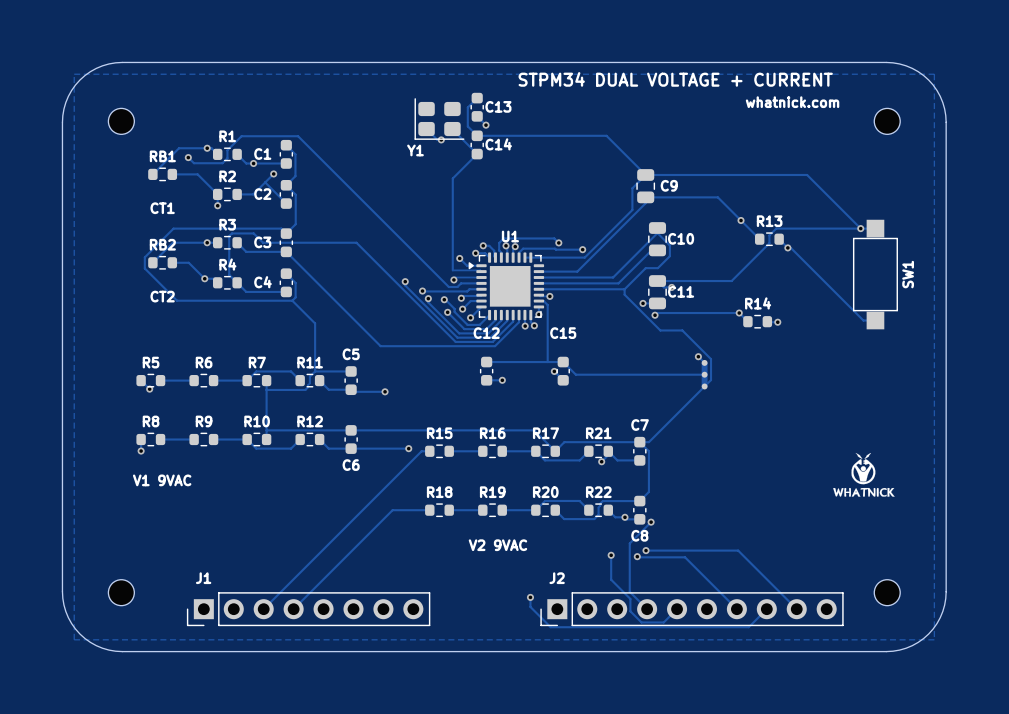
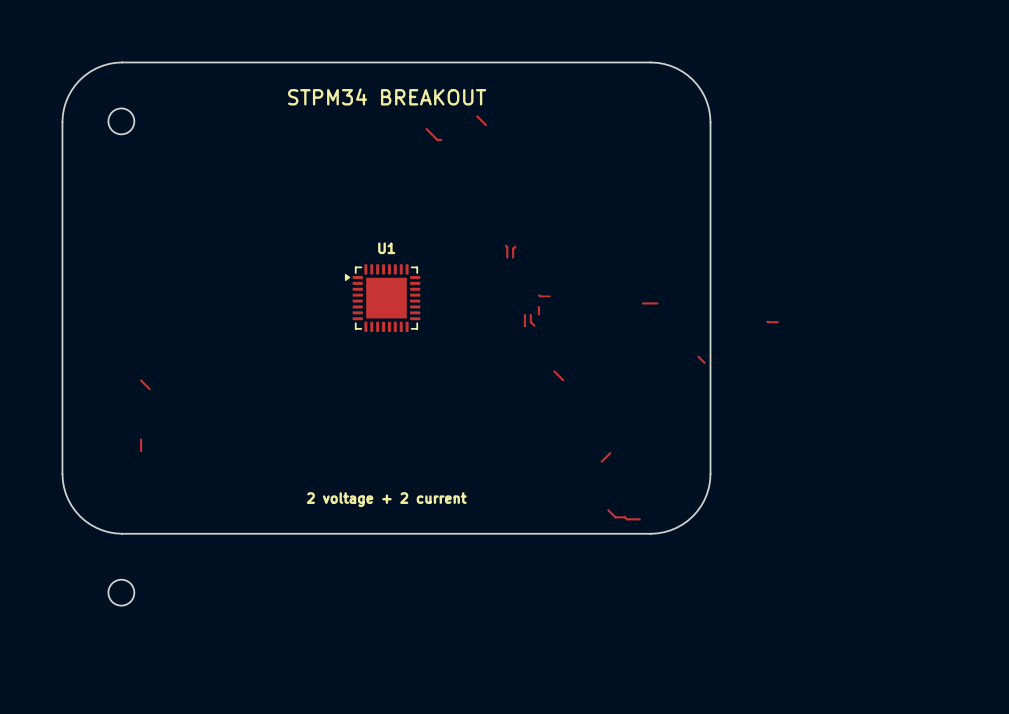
board edge: (650, 62) (893, 62) (906, 65) (918, 71) (933, 85) (940, 96) (944, 109) (946, 122) (946, 591) (942, 611) (936, 623) (928, 634) (918, 642) (906, 648) (886, 651) (109, 650) (96, 645) (79, 634) (71, 623) (63, 605) (62, 473) -> (650, 62) (670, 65) (687, 75) (701, 90) (707, 102) (710, 115) (710, 480) (707, 493) (701, 505) (692, 516) (682, 524) (663, 532) (650, 533) (115, 533) (96, 527) (79, 516) (68, 499) (63, 487) (62, 473)
zone outline: (74, 74) (934, 74) (934, 639) (74, 639) (74, 74) -> none
text: STPM34 DUAL VOLTAGE + CURRENT (675, 79) -> none
text: none -> STPM34 BREAKOUT (387, 96)
track: (477, 98) (467, 107) (467, 126) (477, 135) (606, 135) (645, 174) -> none
text: whatnick.com (792, 102) -> none
C13: (477, 107) -> none
Y1: (439, 119) -> none
part: (887, 121) -> none
via: (486, 125) -> none
track: (452, 129) (477, 154) (452, 178) (452, 270) (481, 271) -> none
via: (441, 139) -> none
C14: (477, 144) -> none
track: (286, 145) (295, 154) (295, 176) (286, 185) (295, 194) (295, 224) (286, 233) (281, 228) (173, 228) (144, 257) (144, 268) (177, 300) (292, 300) -> none
via: (207, 148) -> none
track: (217, 154) (211, 148) (179, 148) (152, 174) -> none
R1: (227, 154) -> none
track: (237, 154) (246, 163) (286, 163) -> none
C1: (286, 154) -> none
track: (188, 157) (193, 163) (222, 163) (227, 158) (227, 150) (241, 136) (298, 136) (448, 287) (457, 287) (461, 283) (481, 283) -> none
via: (188, 157) -> none
via: (253, 163) -> none
track: (273, 173) (253, 194) (237, 194) -> none
via: (273, 173) -> none
RB1: (162, 174) -> none
track: (172, 174) (197, 174) (217, 194) (217, 205) -> none
track: (645, 174) (632, 188) (632, 209) (584, 257) (524, 257) -> none
track: (645, 174) (807, 174) (860, 228) -> none
track: (265, 182) (286, 203) -> none
C9: (645, 186) -> none
R2: (227, 194) -> none
C2: (286, 194) -> none
via: (217, 205) -> none
text: CT1 (162, 208) -> none
via: (741, 220) -> none
via: (860, 228) -> none
track: (875, 228) (776, 228) (769, 235) (769, 243) (731, 281) (657, 281) (663, 287) (671, 287) -> none
track: (657, 233) (613, 277) (538, 277) -> none
track: (657, 233) (669, 245) (669, 256) (657, 268) (645, 268) (624, 289) -> none
C10: (657, 239) -> none
track: (759, 239) (717, 197) (645, 197) (645, 203) (577, 271) (538, 271) -> none
R13: (769, 239) -> none
track: (779, 239) (787, 247) (790, 247) (863, 320) (875, 320) -> none
via: (207, 242) -> none
track: (217, 242) (172, 242) (152, 262) -> none
R3: (227, 242) -> none
track: (237, 242) (246, 251) (286, 251) (380, 346) (495, 346) (519, 322) (519, 315) -> none
C3: (286, 242) -> none
track: (558, 242) (554, 238) (503, 238) (499, 242) (501, 257) -> none
via: (558, 242) -> none
track: (483, 245) (489, 245) (494, 250) (495, 257) -> none
via: (483, 245) -> none
via: (506, 245) -> none
via: (515, 246) -> none
via: (787, 247) -> none
track: (582, 249) (523, 248) (519, 252) (519, 257) -> none
via: (582, 249) -> none
track: (657, 250) (651, 250) (618, 283) (538, 283) -> none
track: (475, 253) (485, 253) (489, 257) -> none
via: (475, 253) -> none
track: (459, 258) (466, 265) (481, 265) -> none
via: (459, 258) -> none
RB2: (162, 262) -> none
track: (172, 262) (188, 262) (204, 278) (213, 278) (217, 282) -> none
track: (286, 273) (295, 282) (295, 297) (292, 300) -> none
SW1: (875, 274) -> none
track: (481, 277) (455, 277) (453, 279) -> none
via: (204, 278) -> none
via: (453, 279) -> none
track: (405, 281) (405, 285) (457, 337) (490, 337) (507, 320) (507, 315) -> none
via: (405, 281) -> none
R4: (227, 282) -> none
C4: (286, 282) -> none
U1 position: (506, 286) -> (382, 298)
via: (671, 287) -> none
track: (481, 289) (469, 289) (467, 291) (422, 291) -> none
track: (538, 289) (624, 289) -> none
track: (624, 289) (624, 294) (660, 330) (682, 330) (711, 359) (711, 380) (648, 442) (564, 442) (555, 451) (534, 430) (266, 430) -> none
track: (286, 291) (246, 291) (229, 274) (229, 236) (231, 233) (253, 233) (263, 242) (356, 242) (455, 341) (492, 341) (513, 321) (513, 315) -> none
via: (422, 291) -> none
C11: (657, 292) -> none
track: (481, 295) (463, 295) (461, 298) -> none
text: CT2 (162, 296) -> none
via: (549, 296) -> none
track: (428, 298) (428, 302) (459, 333) (488, 333) (501, 320) (501, 315) -> none
via: (428, 298) -> none
via: (461, 298) -> none
track: (444, 299) (467, 324) (479, 324) (489, 315) -> none
via: (444, 299) -> none
track: (292, 300) (315, 323) (315, 371) -> none
track: (481, 301) (470, 301) (462, 309) -> none
track: (538, 301) (543, 301) (547, 305) (547, 362) -> none
via: (643, 303) -> none
track: (481, 306) (470, 317) -> none
via: (462, 309) -> none
track: (447, 312) (464, 329) (486, 329) (495, 320) (495, 315) -> none
via: (447, 312) -> none
via: (739, 313) -> none
via: (538, 314) -> none
track: (655, 315) (657, 313) (739, 313) (747, 321) -> none
via: (655, 315) -> none
via: (470, 317) -> none
R14: (757, 321) -> none
via: (777, 322) -> none
via: (534, 325) -> none
via: (525, 326) -> none
via: (698, 356) -> none
track: (486, 362) (563, 362) (575, 374) (704, 374) -> none
track: (315, 371) (351, 371) -> none
track: (315, 371) (309, 376) (309, 383) (305, 389) (266, 389) -> none
C12: (486, 371) -> none
via: (554, 371) -> none
C15: (563, 371) -> none
part: (704, 374) -> none
R5: (150, 380) -> none
track: (160, 380) (194, 380) -> none
R6: (203, 380) -> none
track: (213, 380) (247, 380) (256, 371) (291, 371) (300, 380) -> none
R7: (256, 380) -> none
track: (266, 380) (266, 439) -> none
R11: (309, 380) -> none
track: (319, 380) (328, 389) (385, 391) -> none
C5: (351, 380) -> none
track: (486, 380) (502, 380) -> none
via: (502, 380) -> none
via: (149, 389) -> none
via: (385, 391) -> none
R8: (150, 439) -> none
track: (160, 439) (194, 439) -> none
R9: (203, 439) -> none
track: (213, 439) (247, 439) (256, 448) (291, 448) (300, 439) -> none
R10: (256, 439) -> none
R12: (309, 439) -> none
track: (319, 439) (328, 448) (408, 448) -> none
C6: (351, 439) -> none
track: (639, 442) (648, 451) (648, 491) (639, 501) (602, 501) (598, 507) (598, 514) (594, 519) (564, 519) (555, 510) -> none
via: (408, 448) -> none
via: (141, 451) -> none
track: (429, 451) (421, 451) (263, 609) -> none
R15: (439, 451) -> none
track: (449, 451) (482, 451) -> none
R16: (492, 451) -> none
track: (502, 451) (535, 451) (544, 460) (579, 460) (588, 451) -> none
R17: (545, 451) -> none
R21: (598, 451) -> none
track: (608, 451) (617, 460) (639, 460) -> none
C7: (639, 451) -> none
drawing: [833, 452, 895, 497] -> none
via: (601, 461) -> none
text: V1 9VAC (162, 480) -> none
text: none -> 2 voltage + 2 current (386, 499)
track: (429, 510) (392, 510) (293, 609) -> none
R18: (439, 510) -> none
track: (449, 510) (482, 510) -> none
R19: (492, 510) -> none
track: (502, 510) (535, 510) (545, 500) (579, 500) (588, 510) -> none
R20: (545, 510) -> none
R22: (598, 510) -> none
C8: (639, 510) -> none
via: (624, 517) -> none
track: (651, 522) (629, 543) (629, 591) (647, 609) -> none
via: (651, 522) -> none
text: V2 9VAC (497, 545) -> none
track: (646, 550) (738, 550) (796, 609) -> none
via: (646, 550) -> none
track: (611, 555) (611, 579) (630, 598) (630, 611) (641, 622) (663, 622) (677, 609) -> none
via: (611, 555) -> none
track: (637, 556) (685, 557) (736, 609) -> none
via: (637, 556) -> none
part: (887, 592) -> none
track: (530, 597) (530, 606) (550, 627) (748, 627) (766, 609) -> none
via: (530, 597) -> none
J1: (308, 609) -> none
J2: (692, 609) -> none

